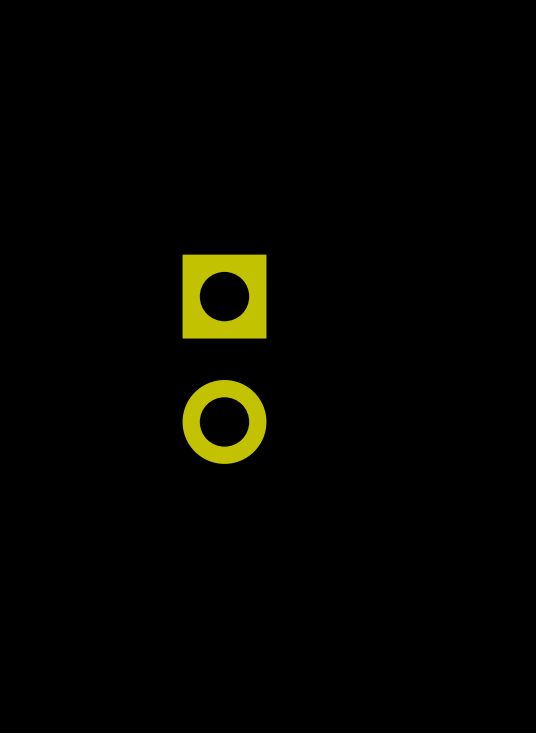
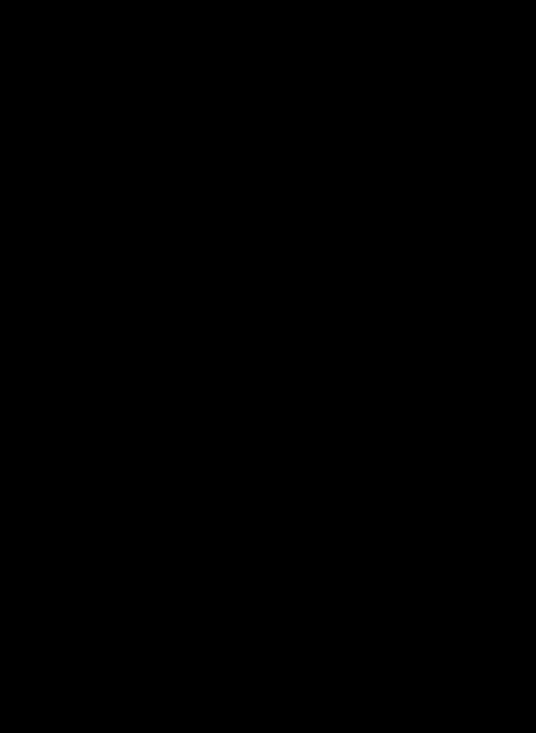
part: (224, 359) -> none

